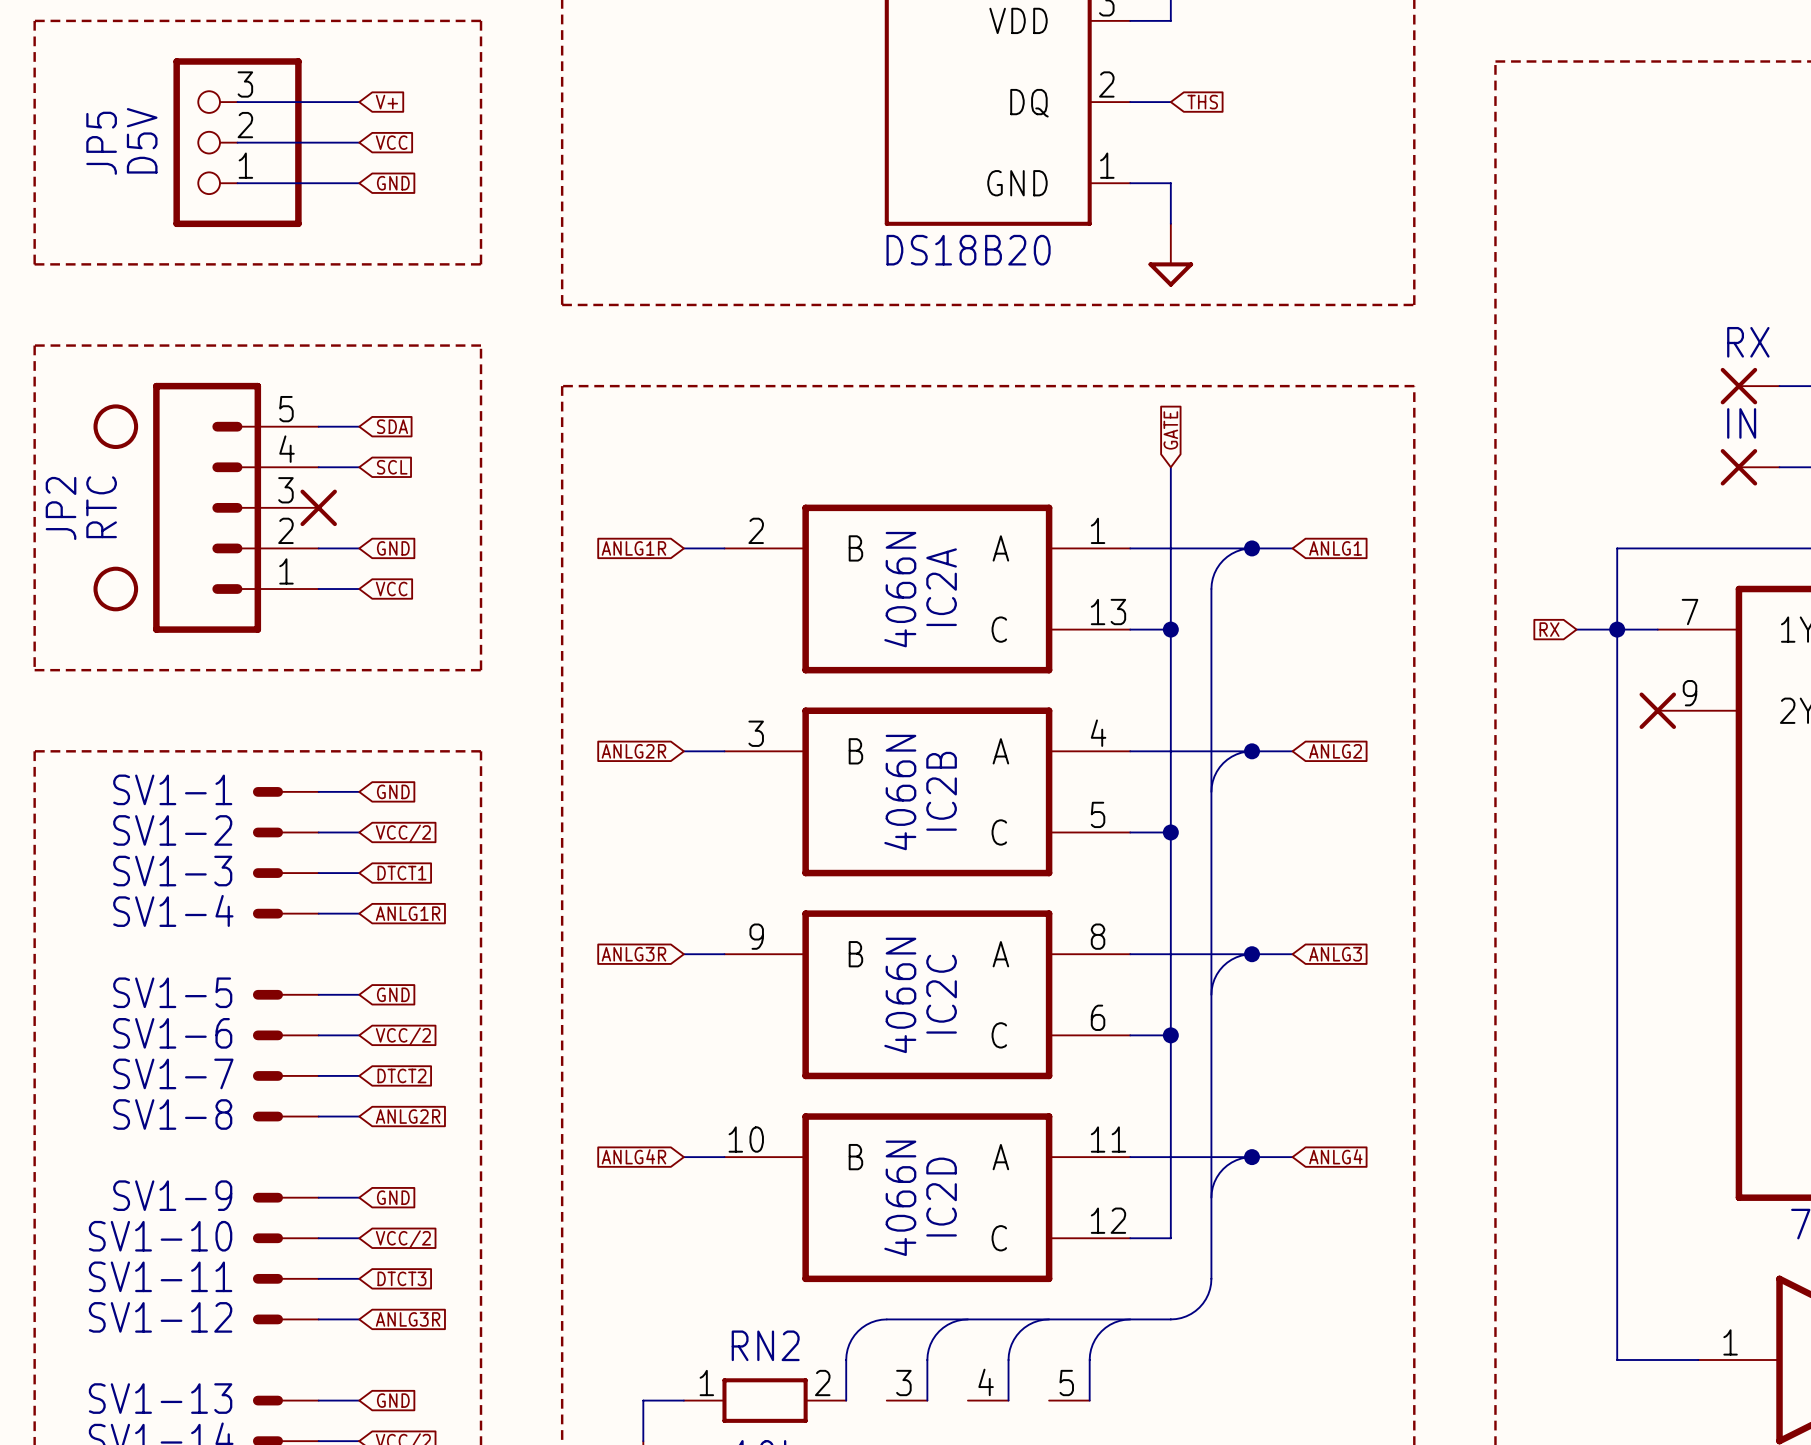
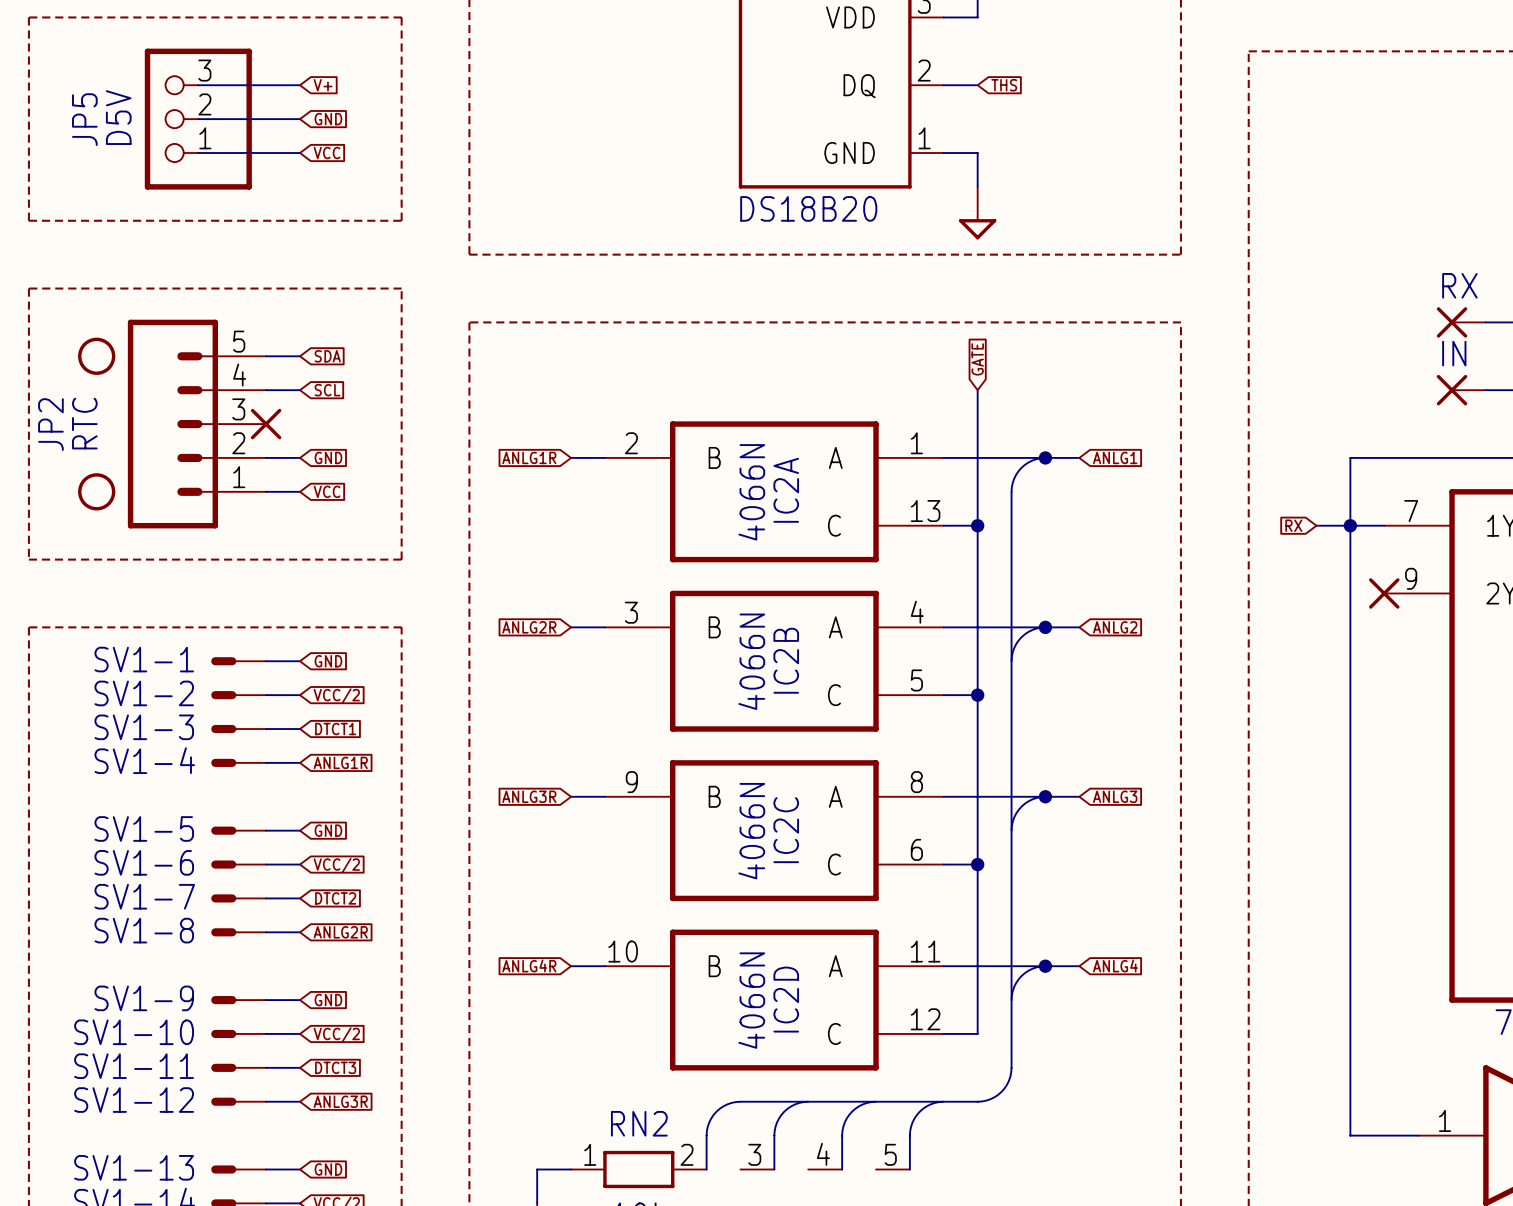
global label: VCC (391, 142) -> GND (328, 119)
global label: GND (393, 183) -> VCC (327, 153)

